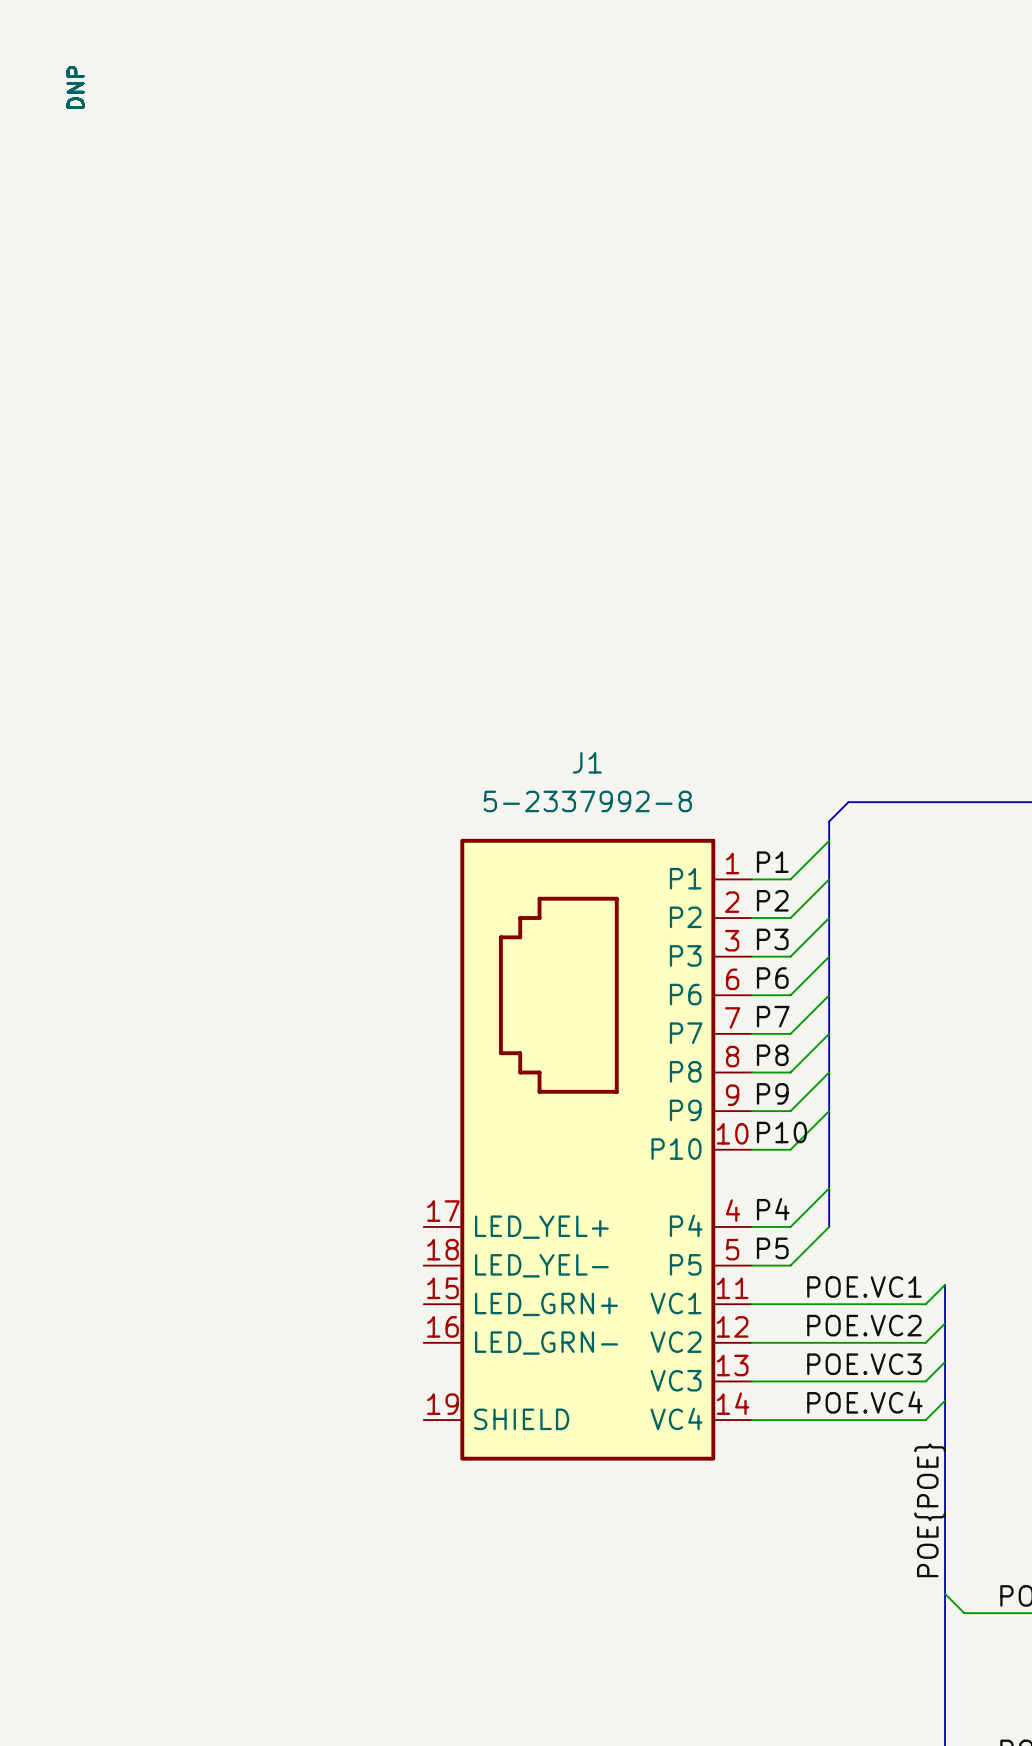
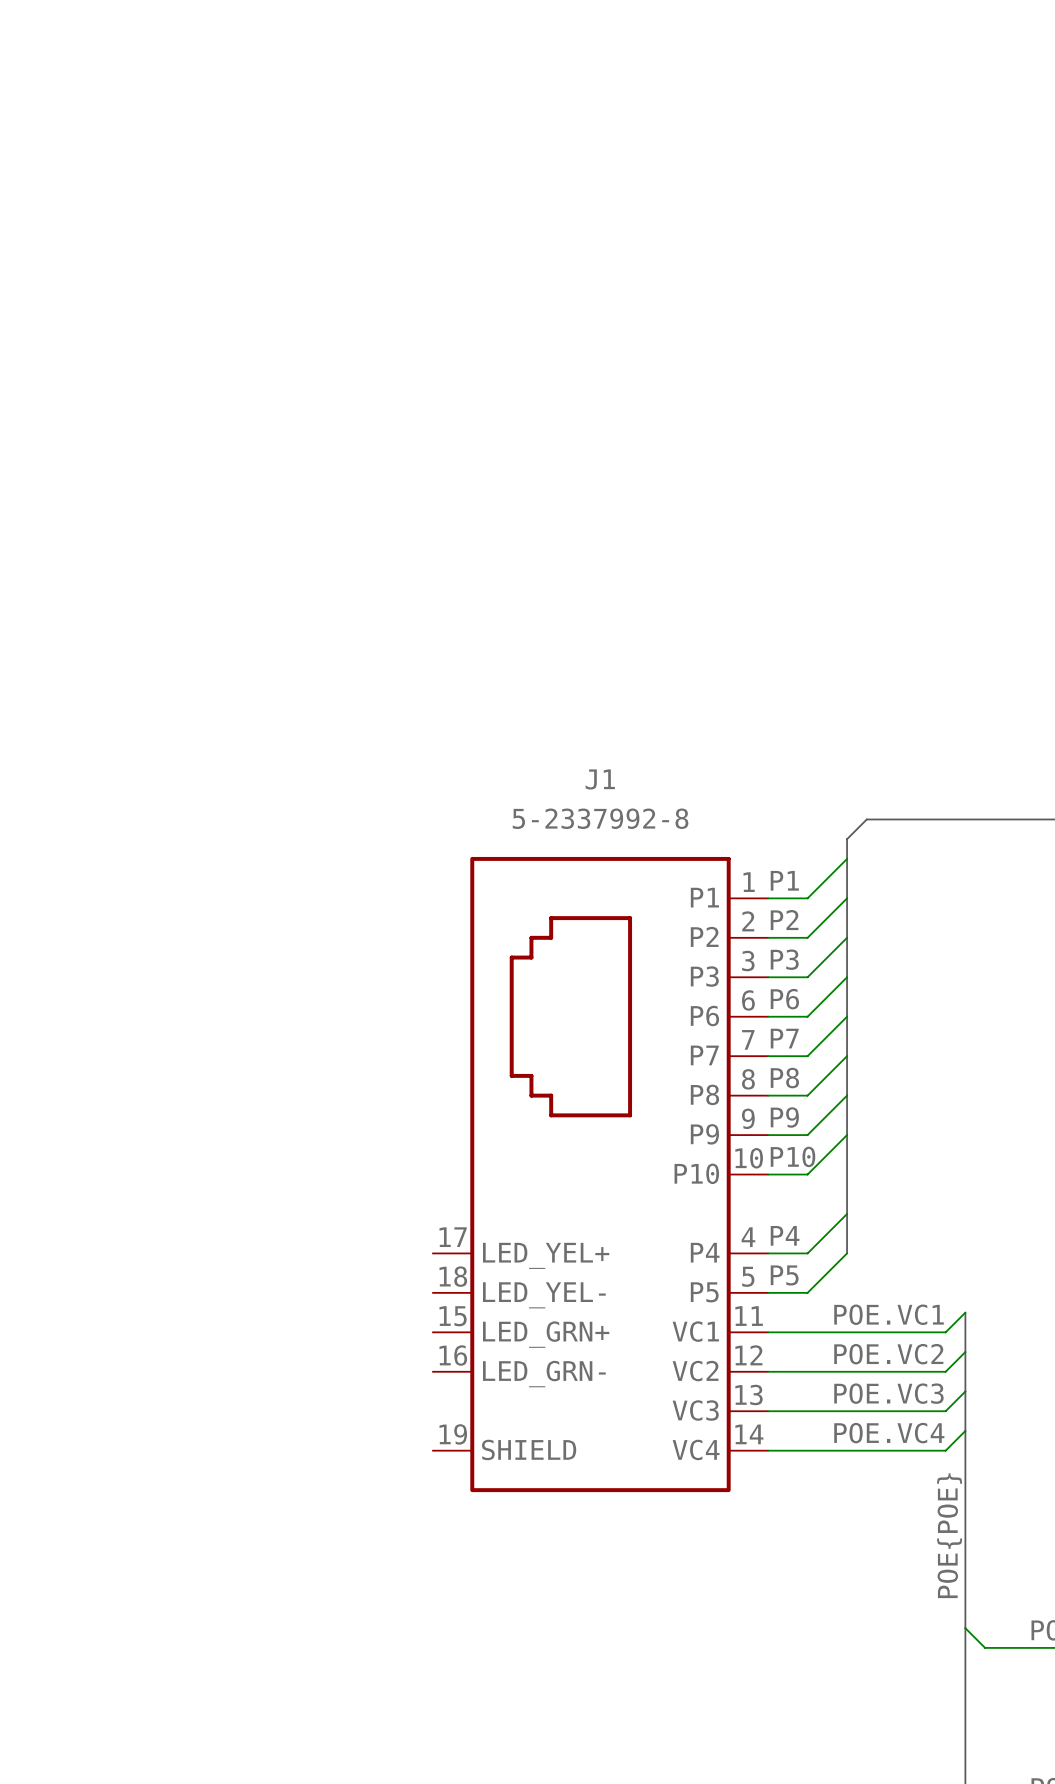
part text: DNP (75, 87) -> none
part text: DNP (75, 87) -> none
part text: DNP (75, 87) -> none
part text: DNP (75, 87) -> none
part text: DNP (75, 87) -> none
part text: DNP (75, 87) -> none
part text: DNP (75, 87) -> none
part text: DNP (75, 87) -> none
part text: DNP (75, 87) -> none

